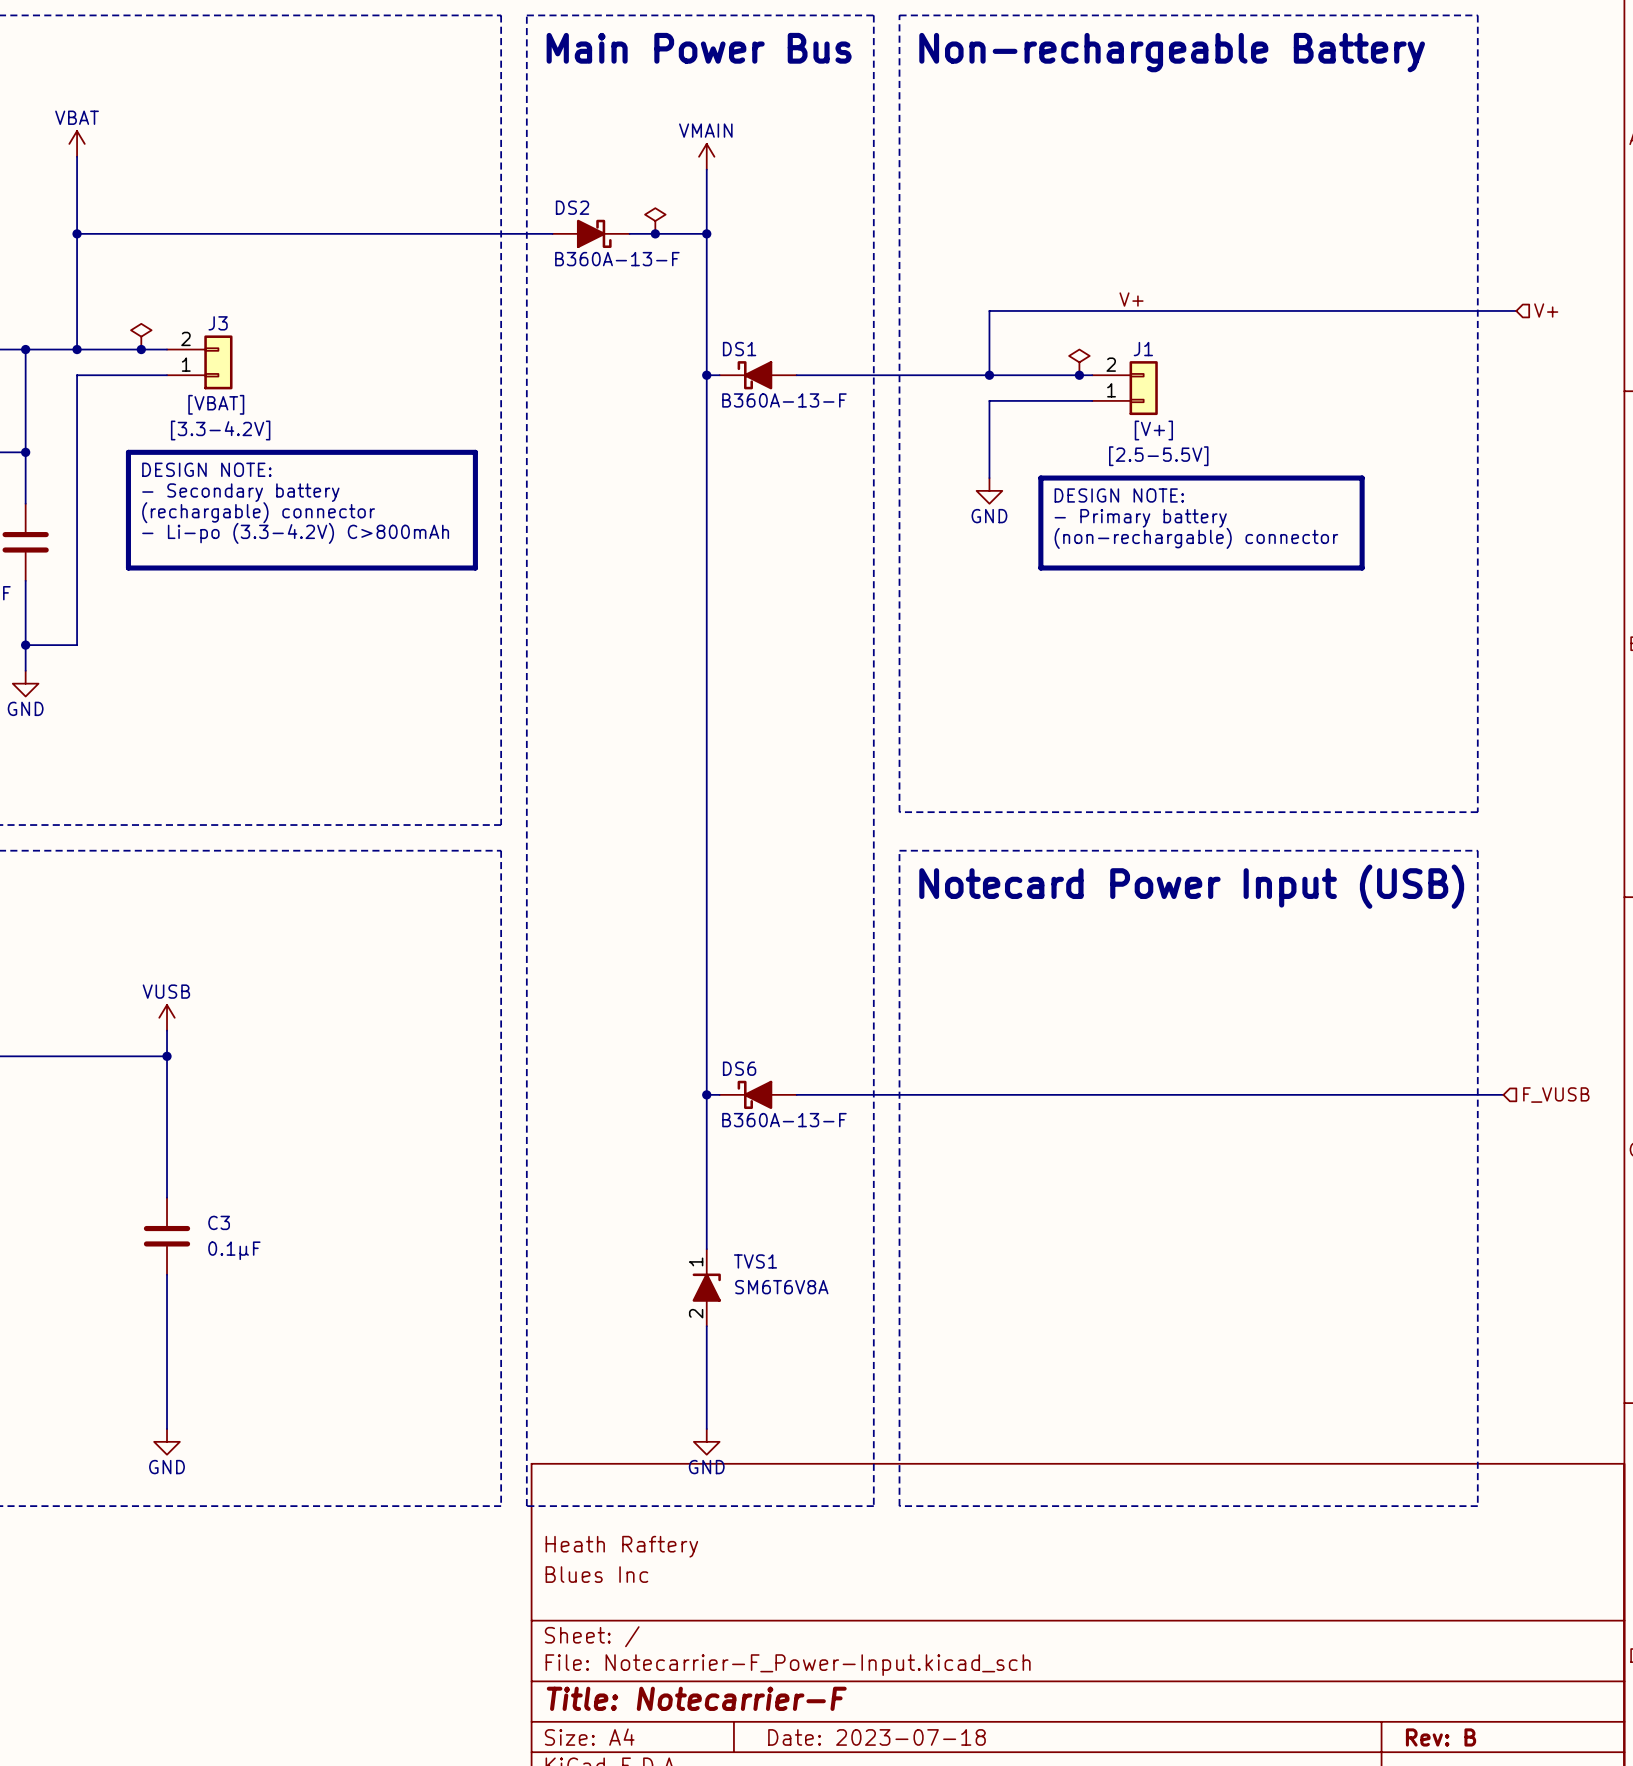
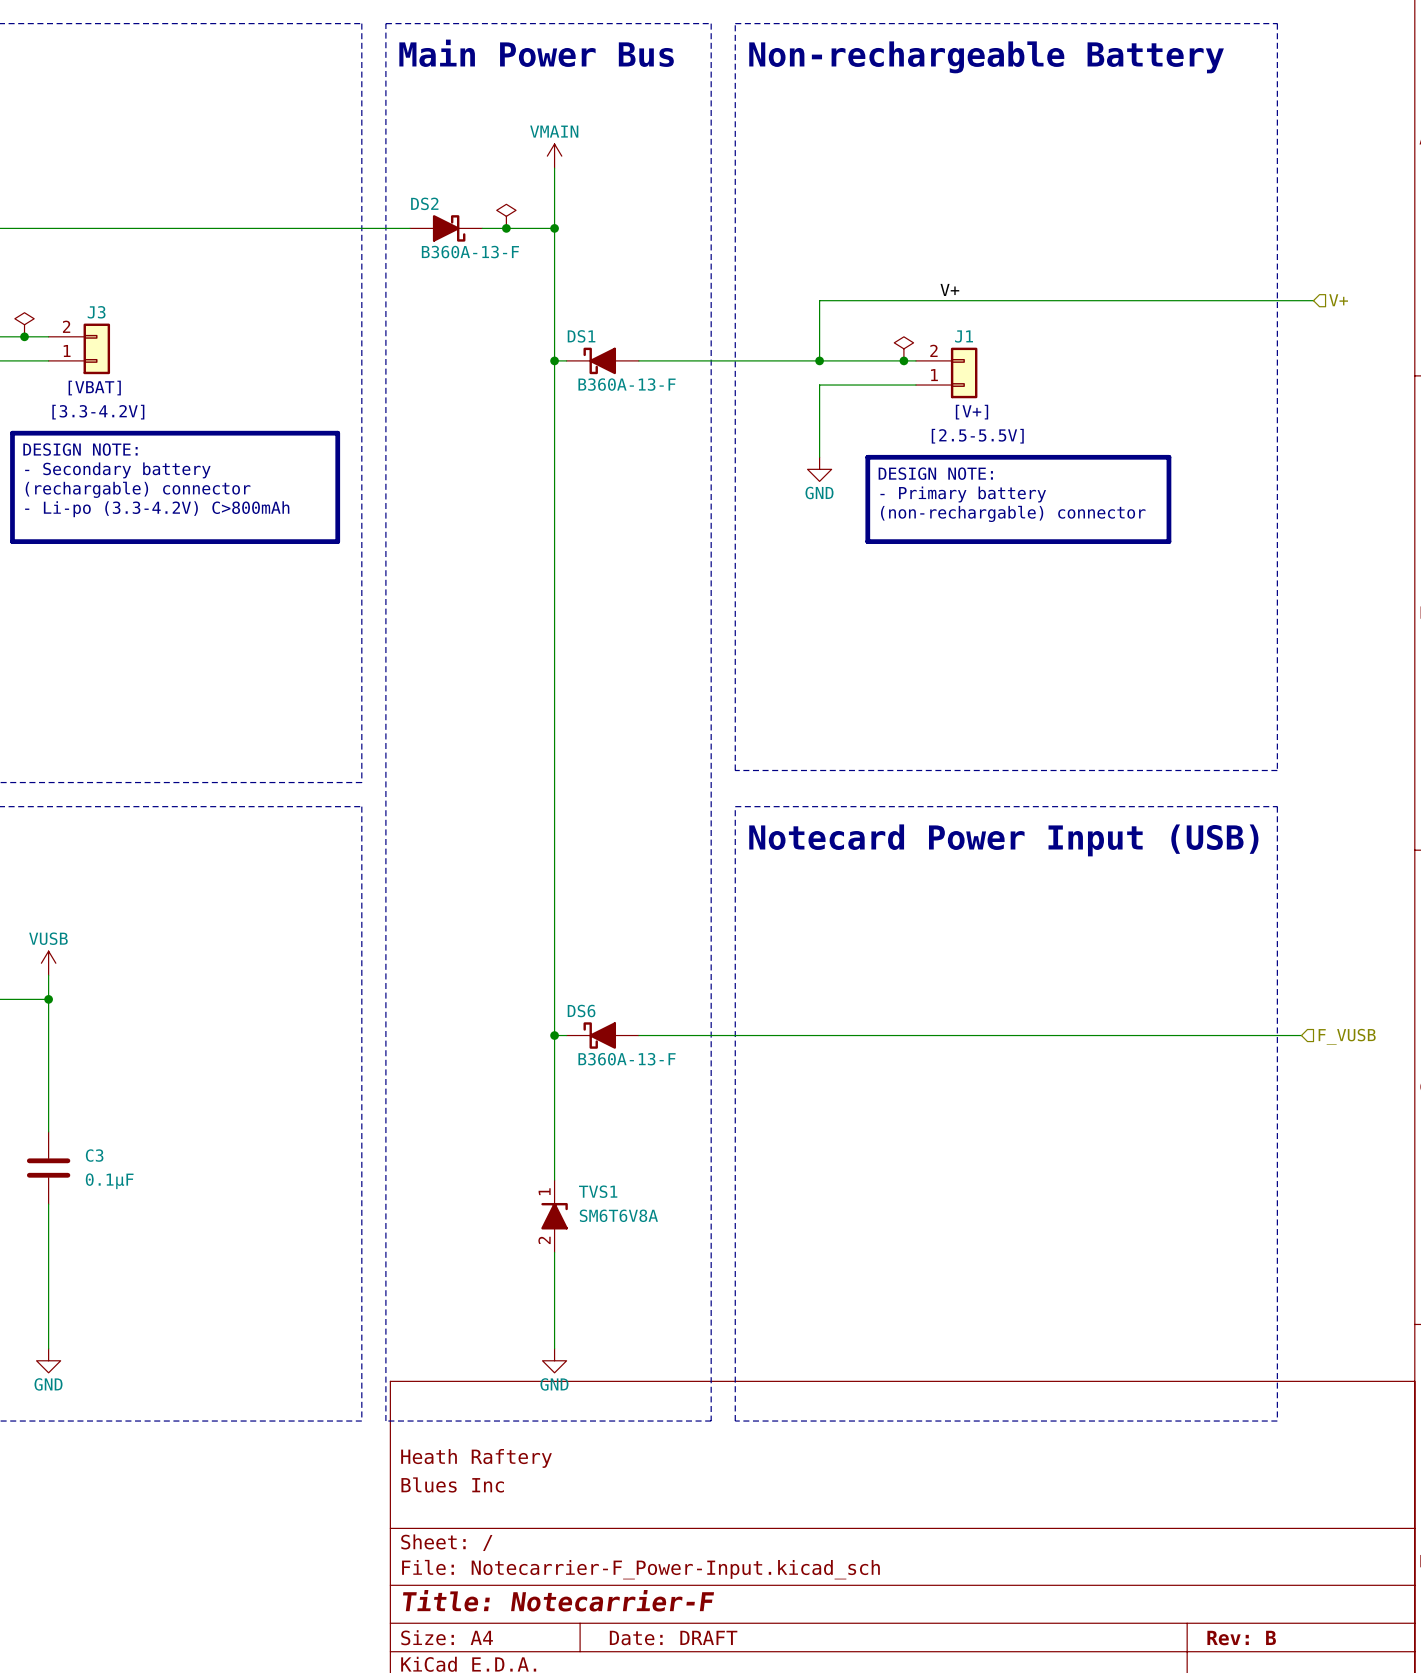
title block: Date: 2023-07-18 (877, 1737) -> Date: DRAFT (673, 1638)

